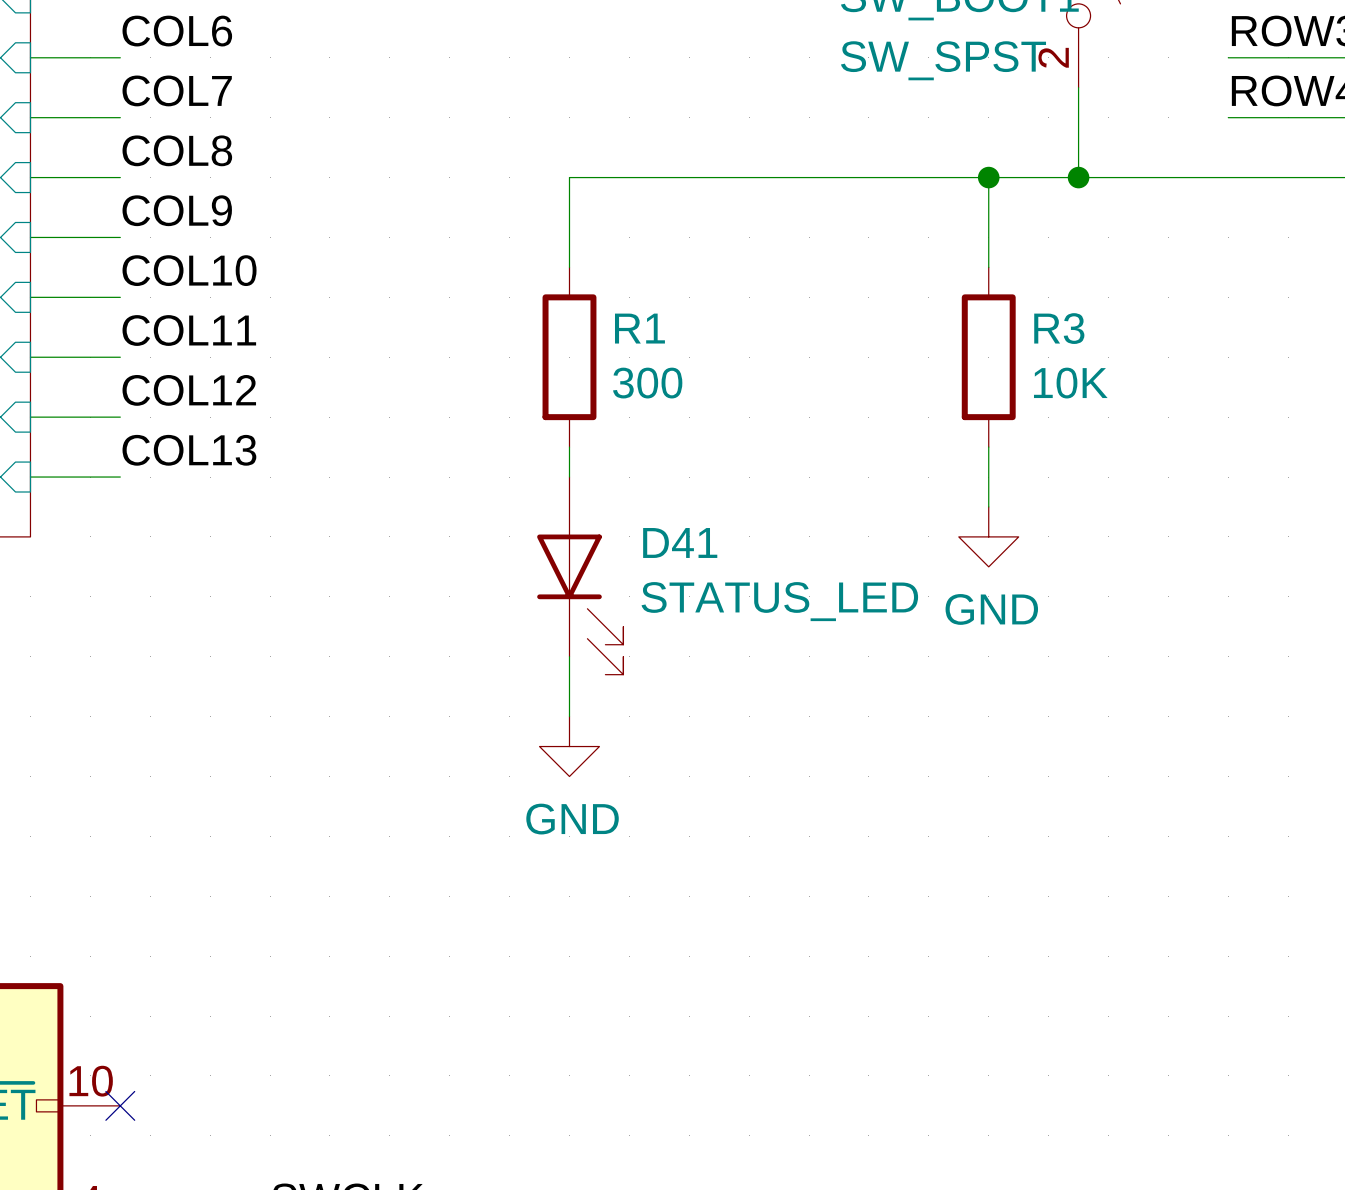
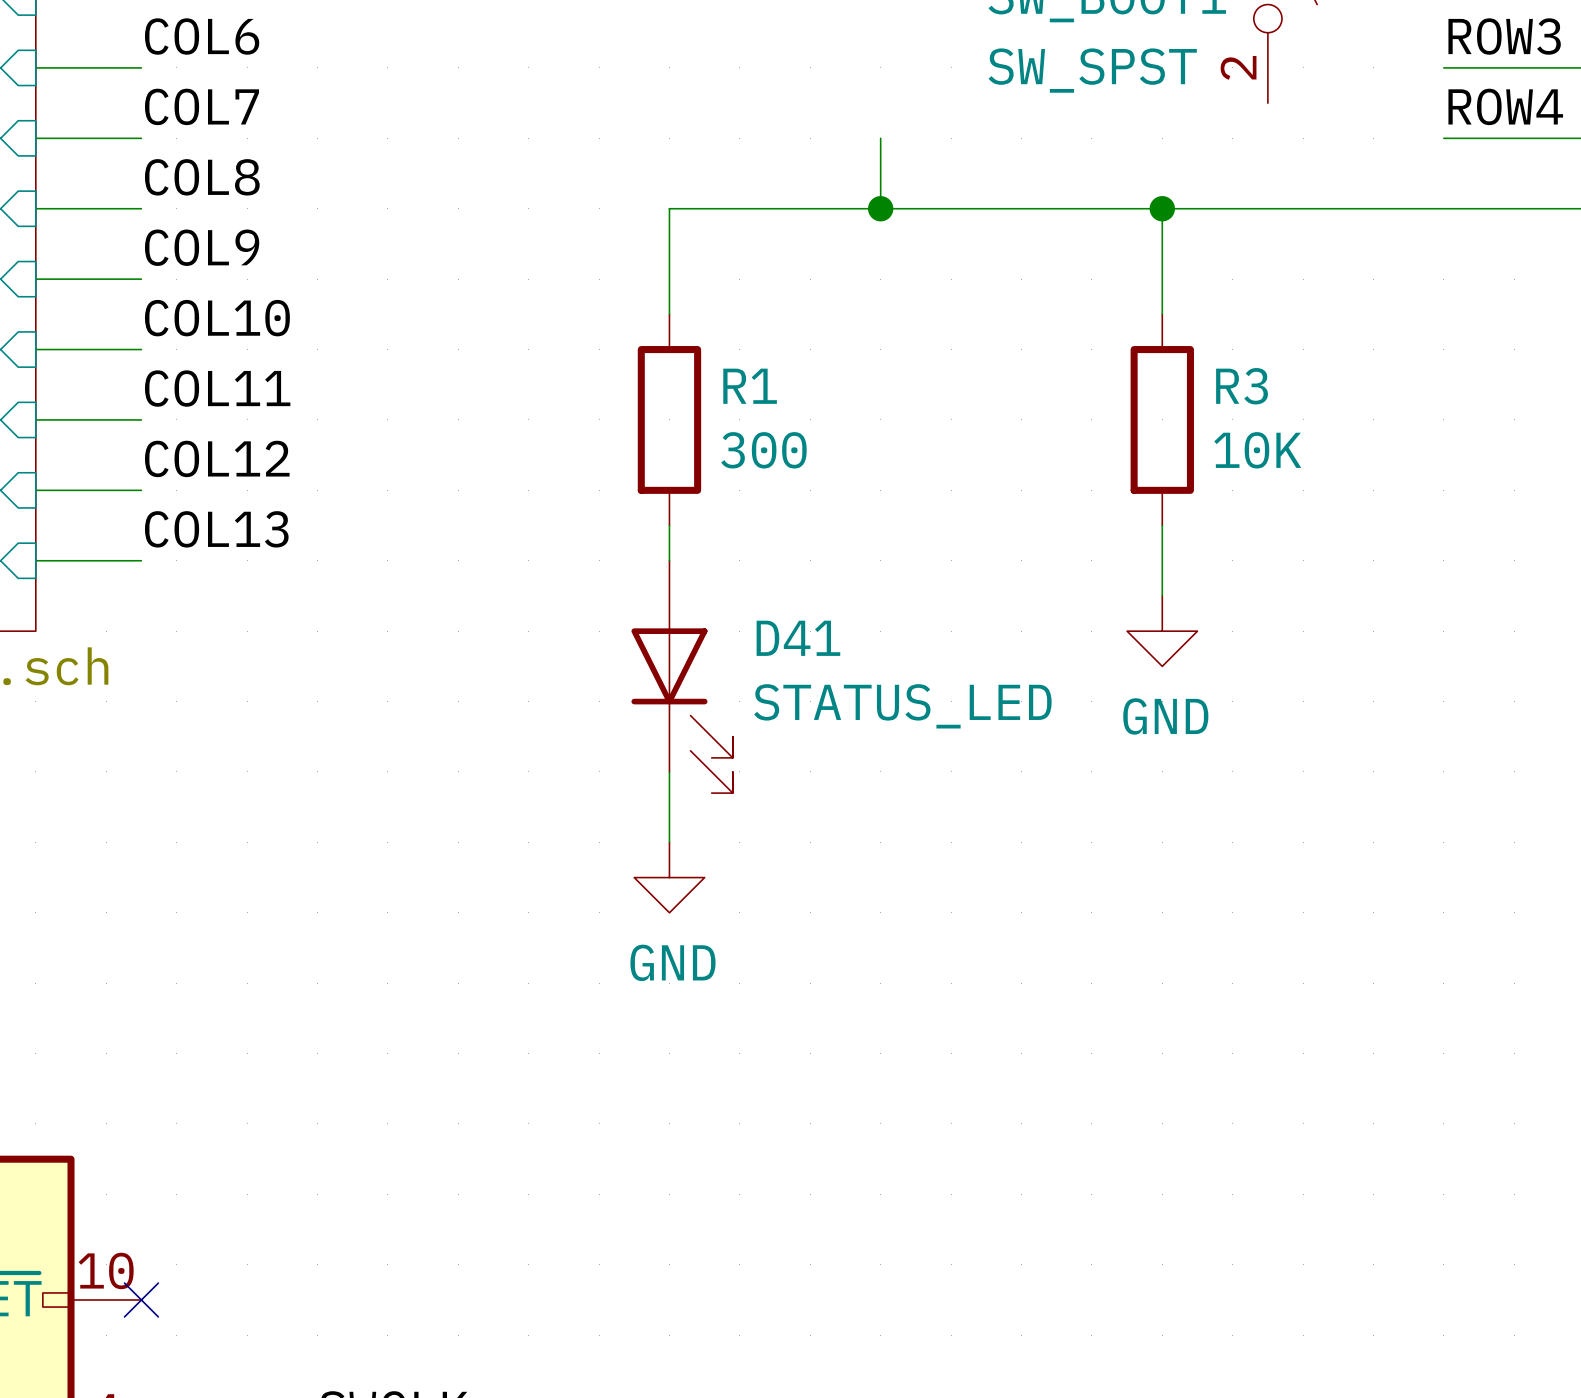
wire: (1078, 87) (1078, 177) -> none
wire: none -> (880, 138) (880, 208)
junction: none -> (880, 208)
junction: (1078, 177) -> none

